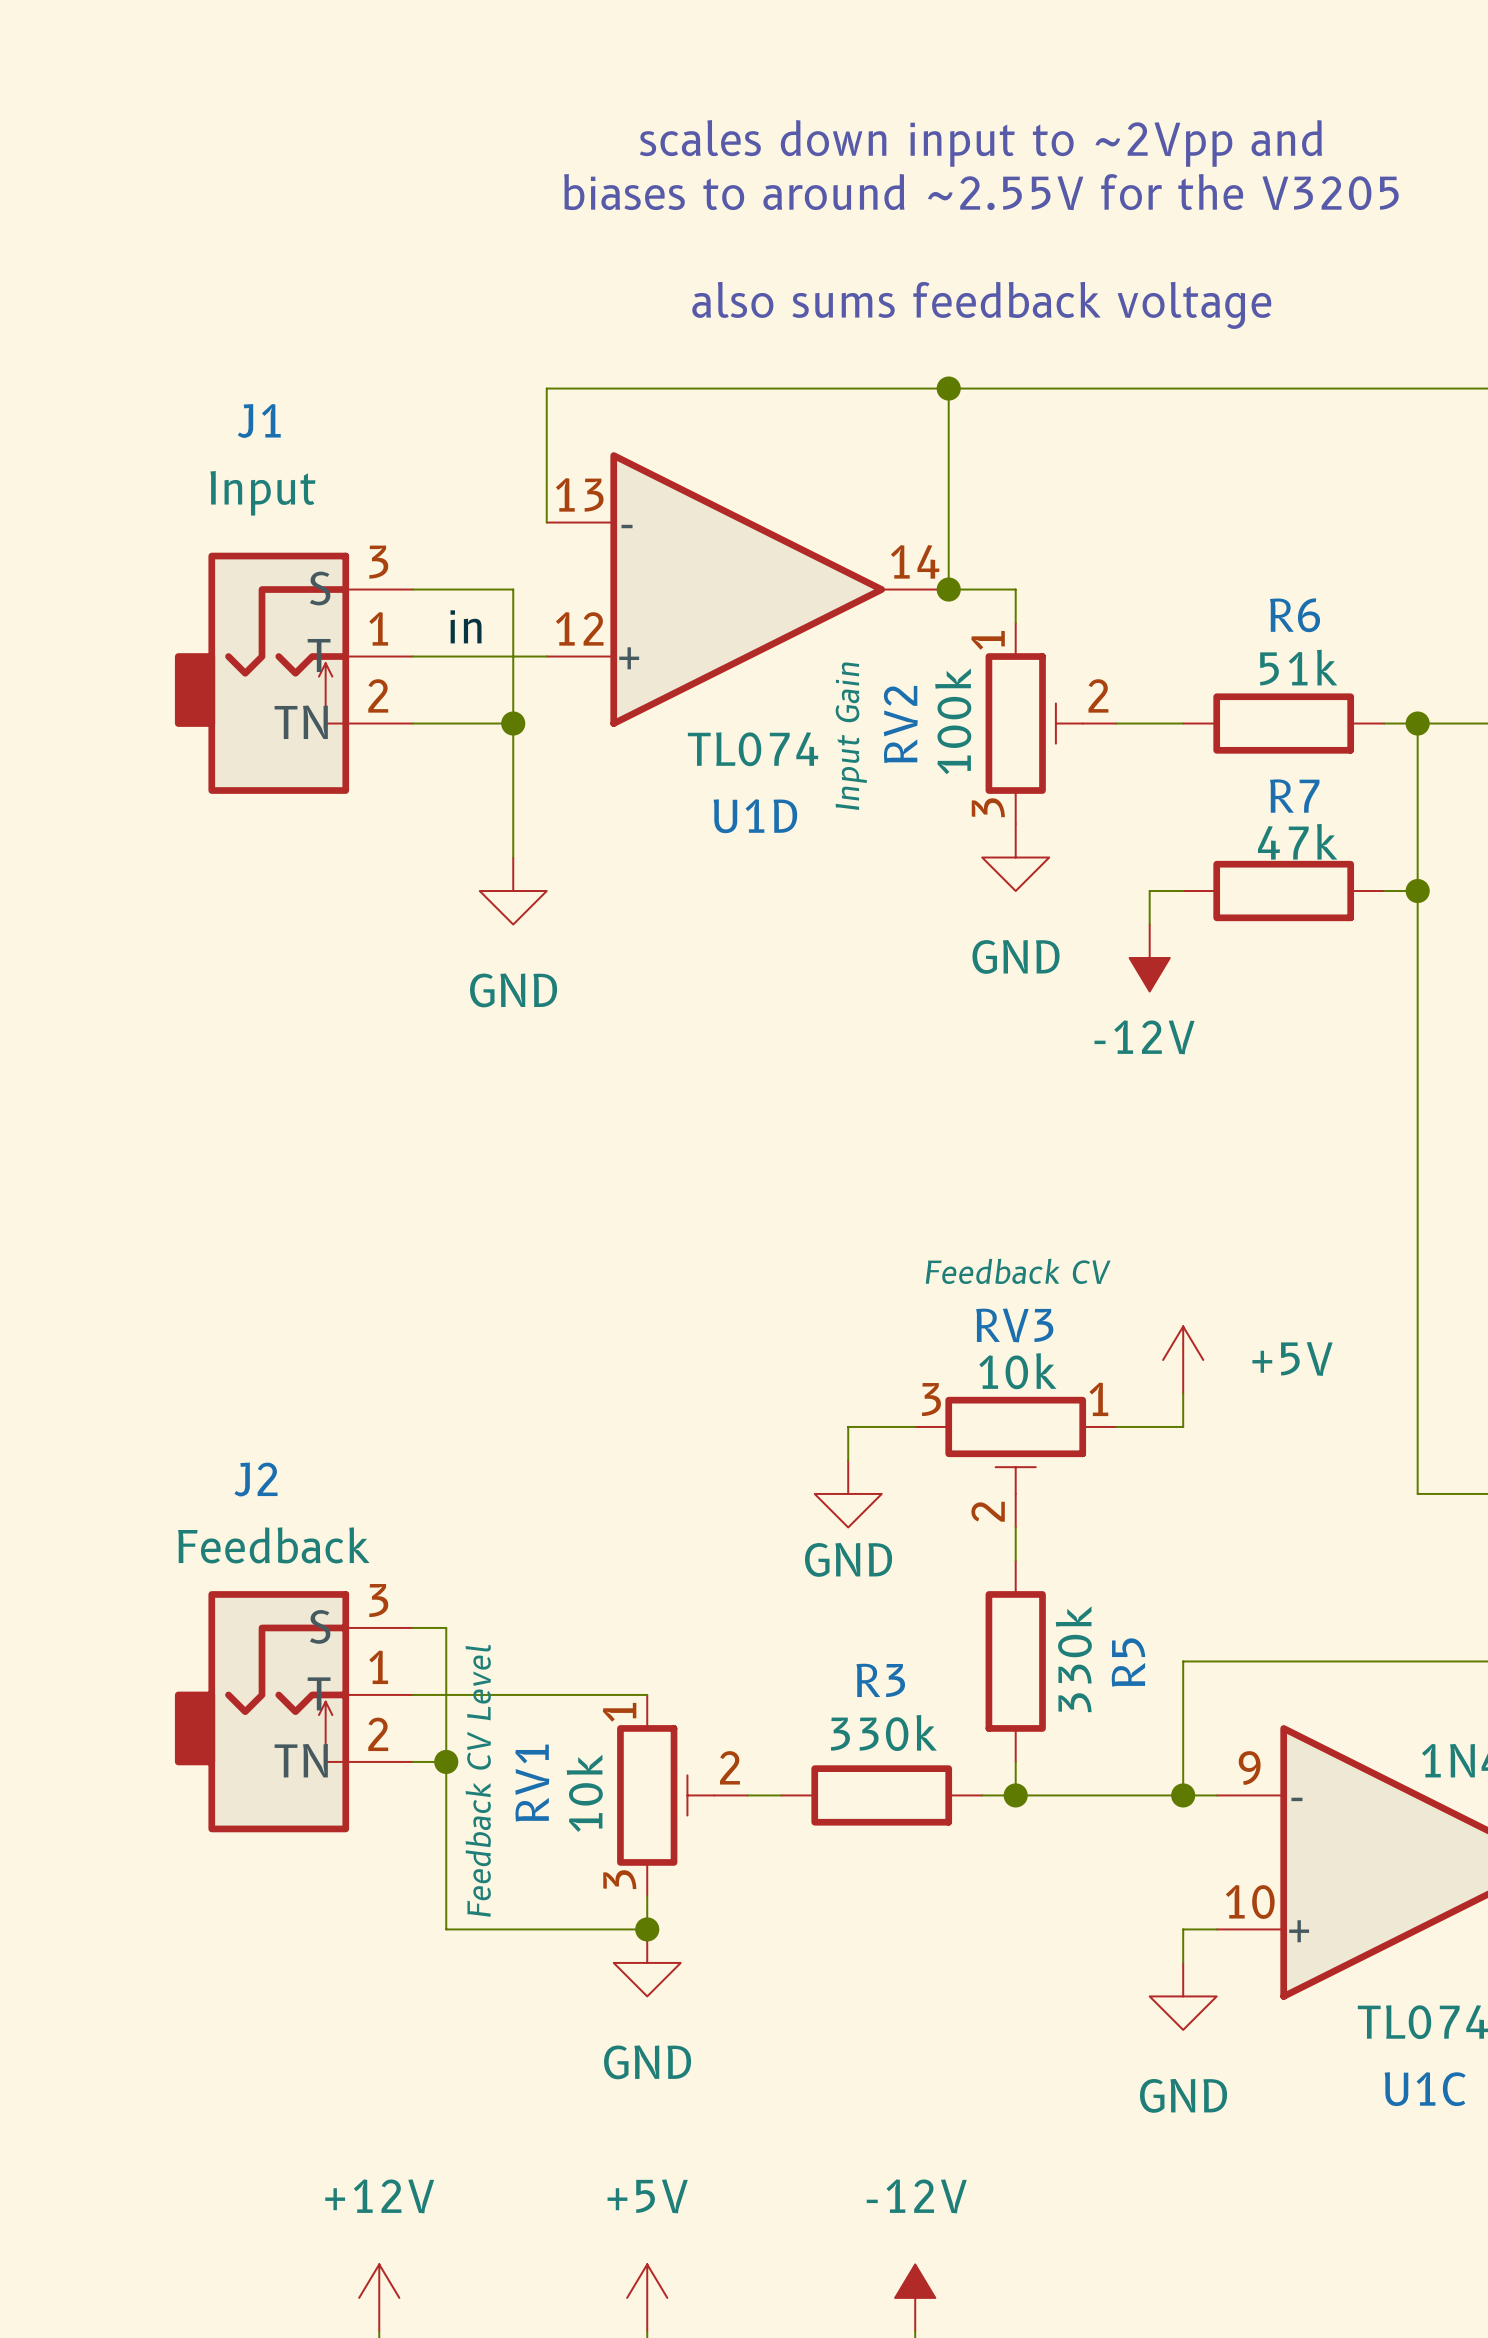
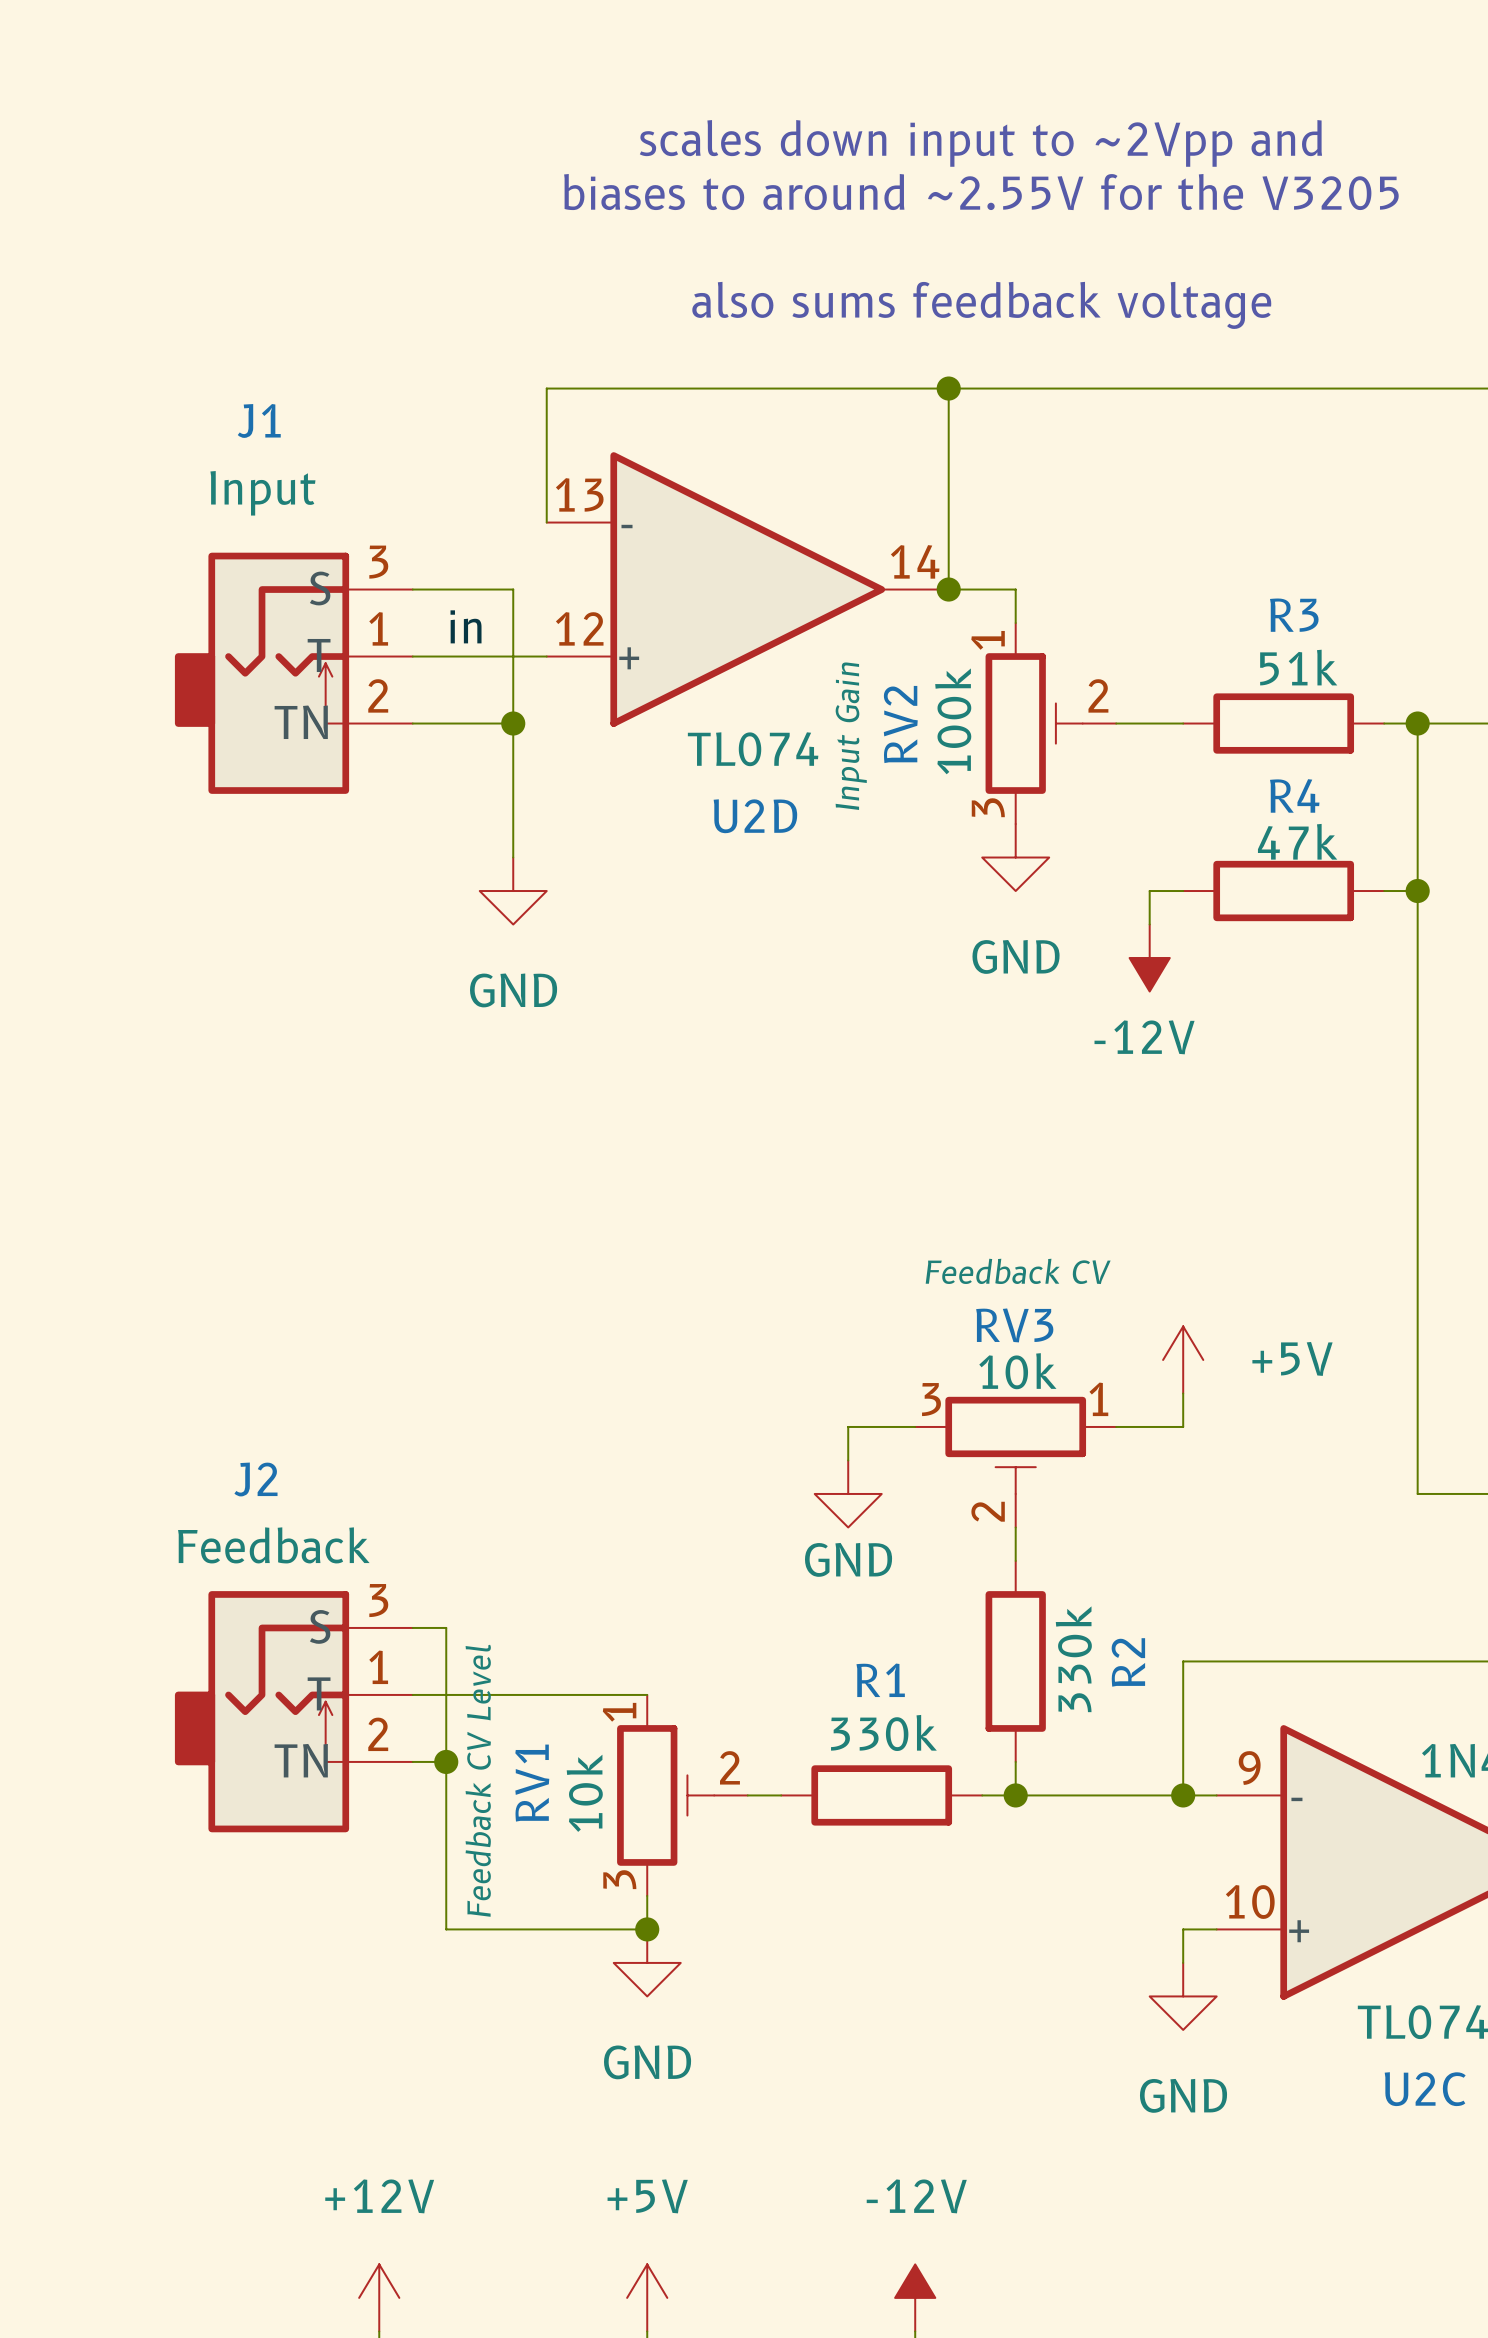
R6 name: R6 (1295, 615) -> R3 (1294, 615)
R7 name: R7 (1294, 796) -> R4 (1294, 795)
U1D name: U1D (755, 816) -> U2D (755, 816)
R5 name: R5 (1128, 1662) -> R2 (1128, 1662)
R3 name: R3 (880, 1680) -> R1 (880, 1680)
U1C name: U1C (1425, 2089) -> U2C (1425, 2089)

